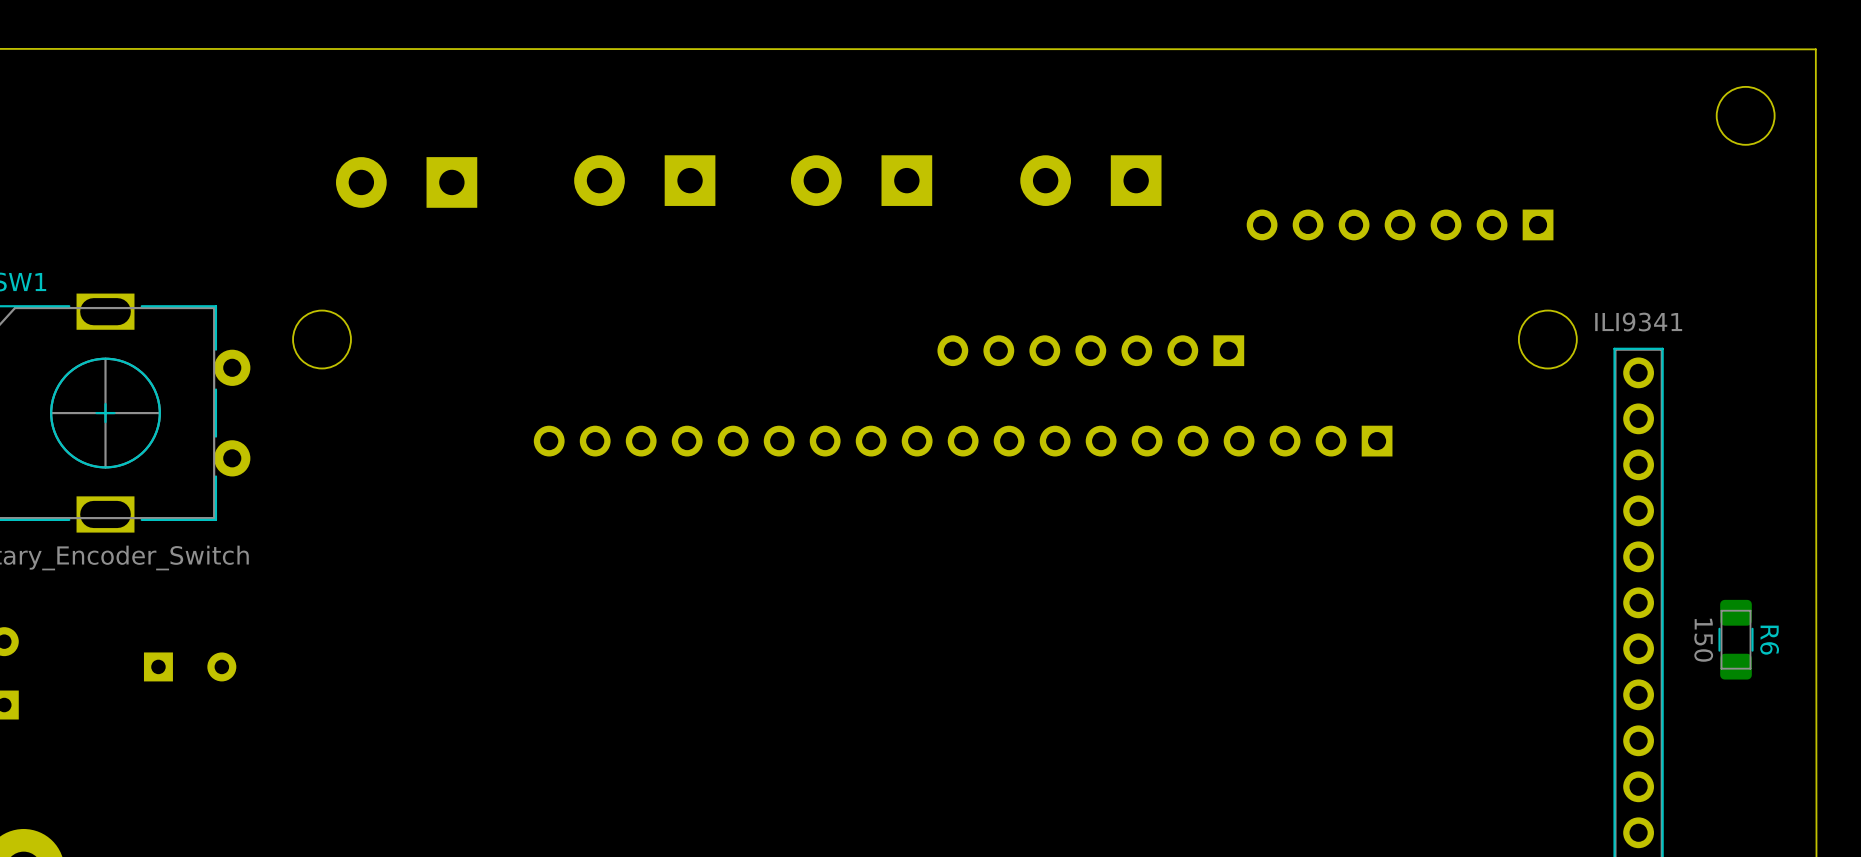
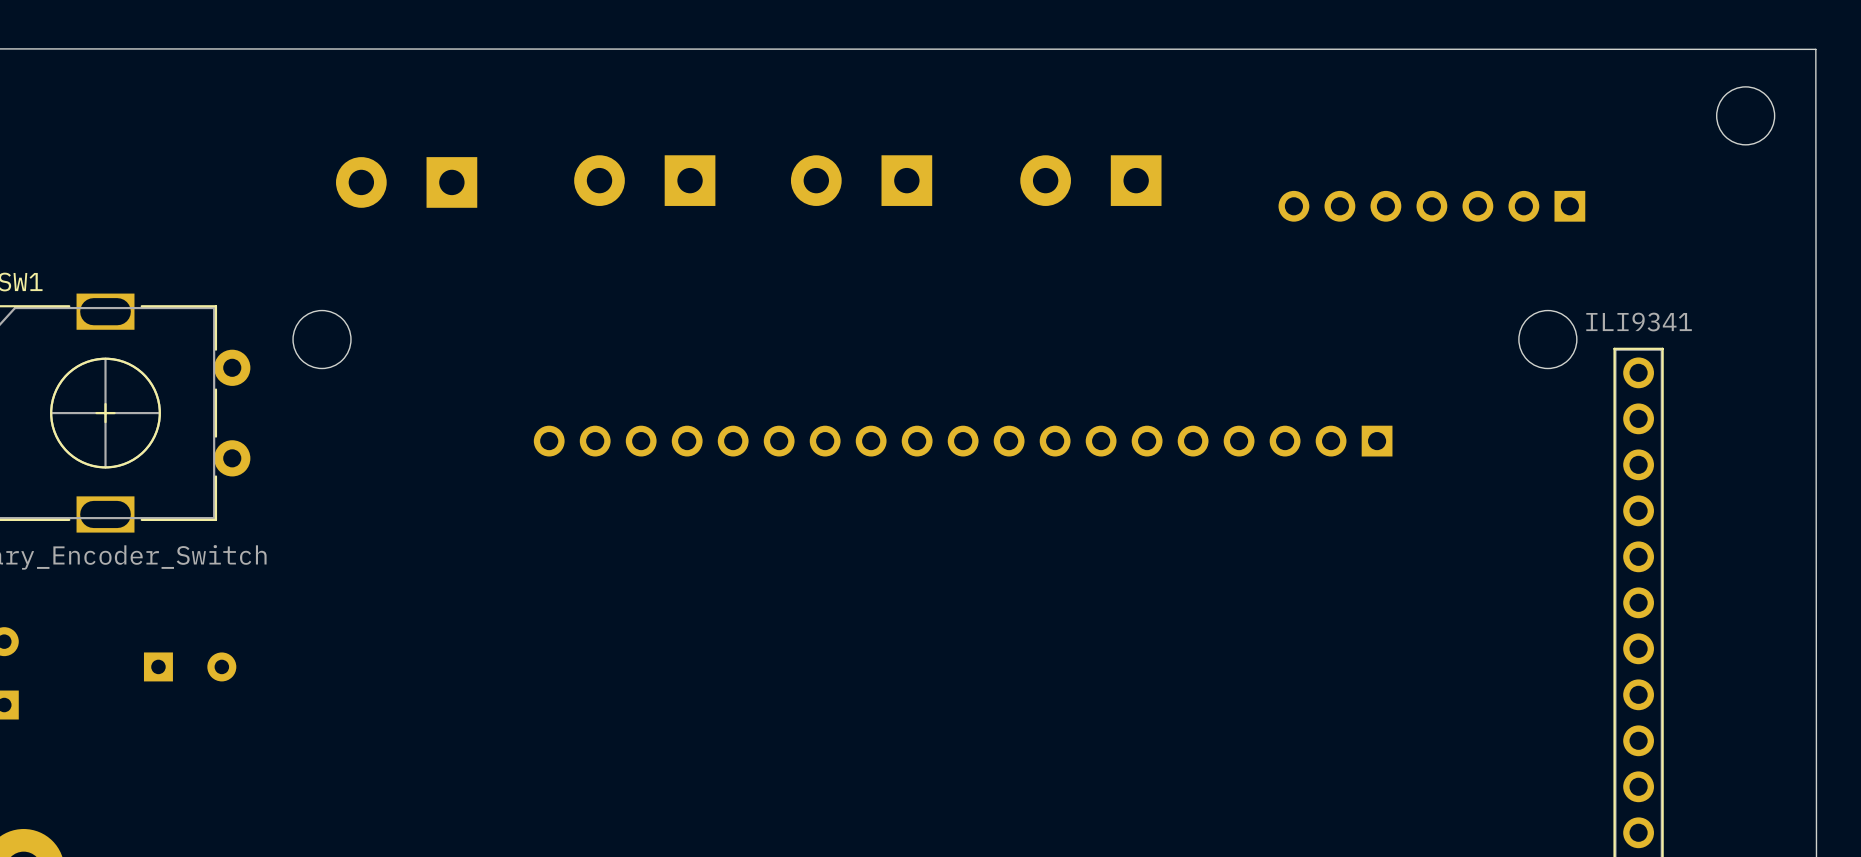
part position: (1400, 224) -> (1431, 206)
part: (1090, 350) -> none
R6: 150 (1736, 639) -> none

